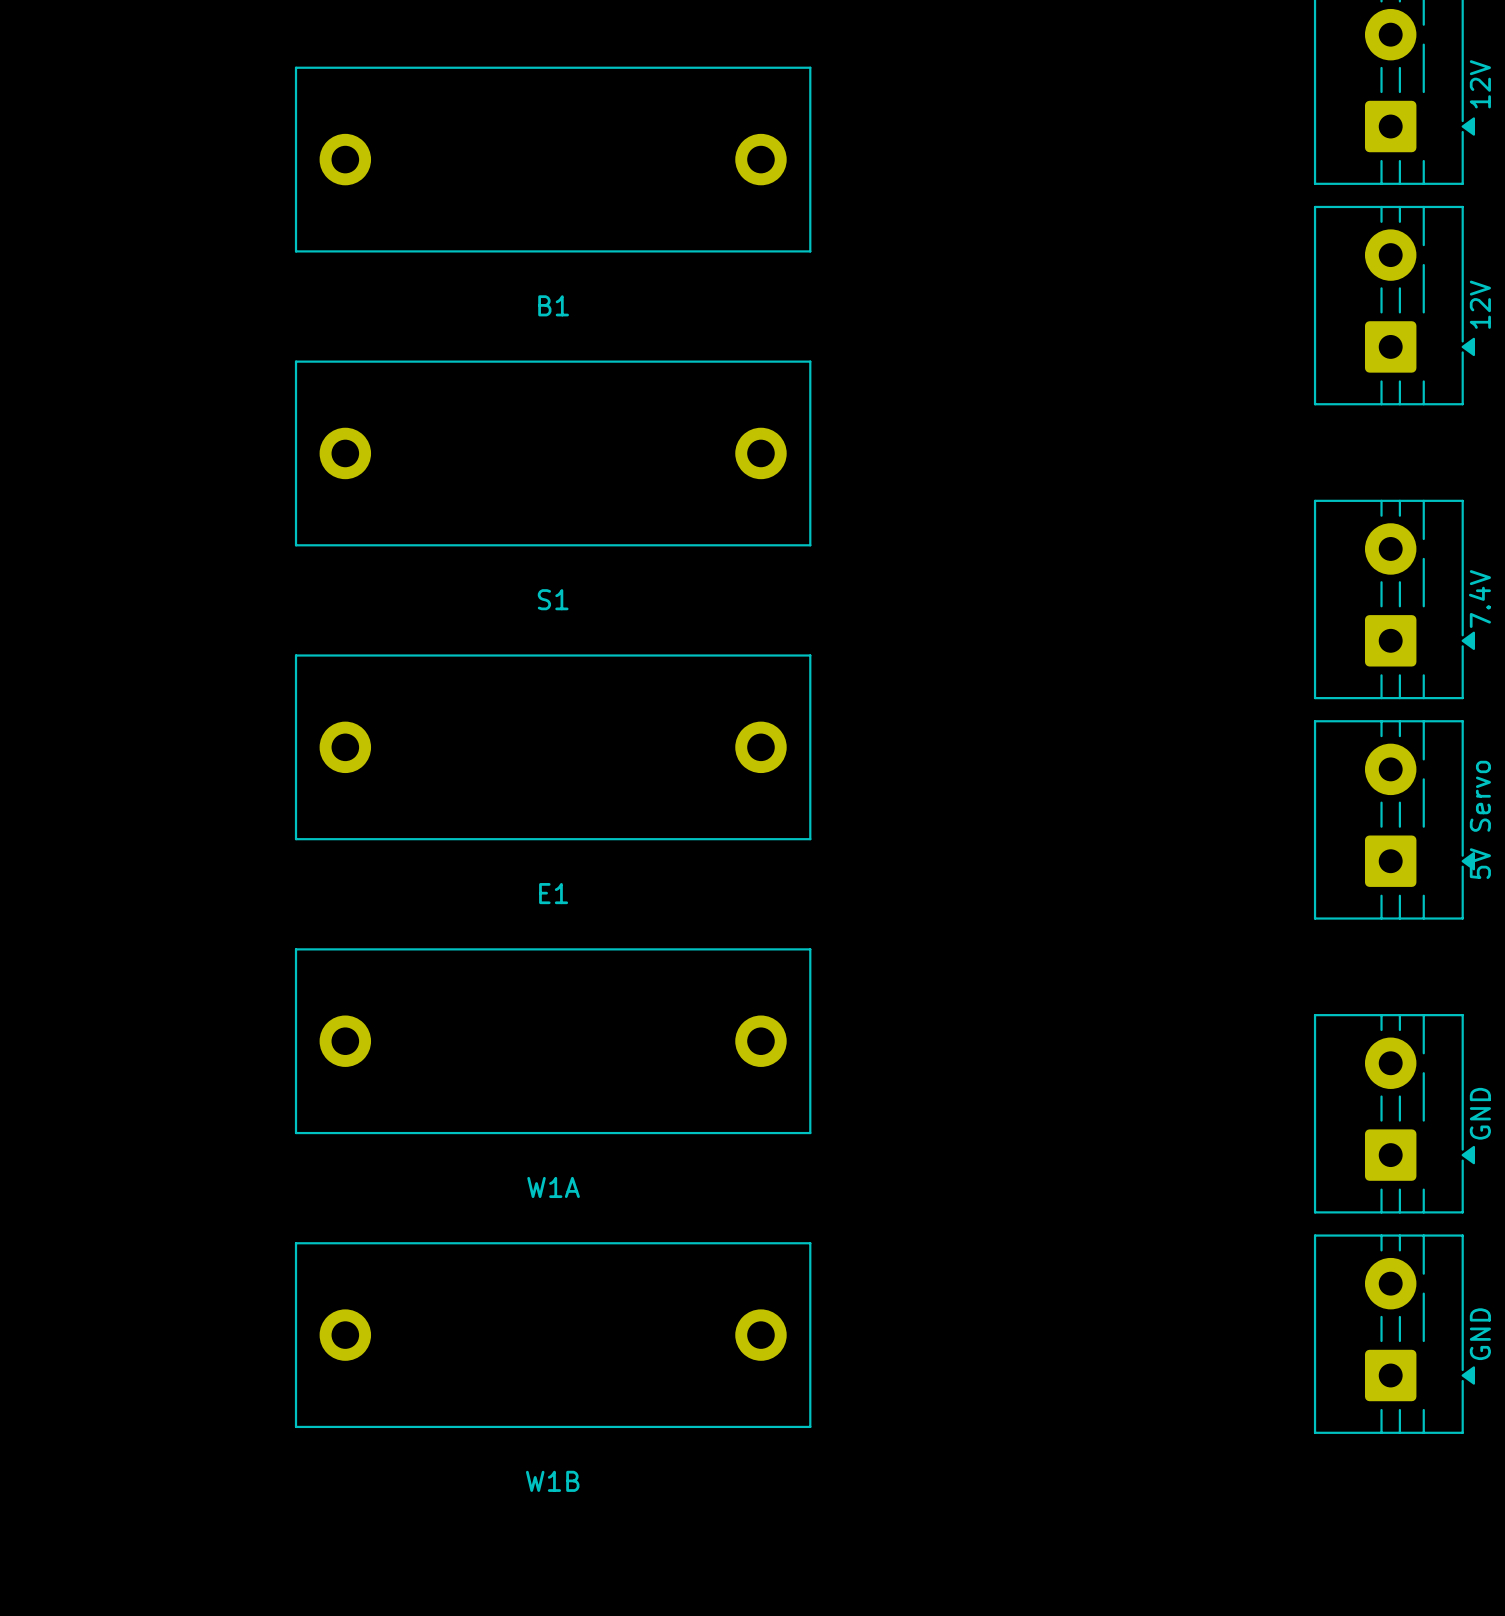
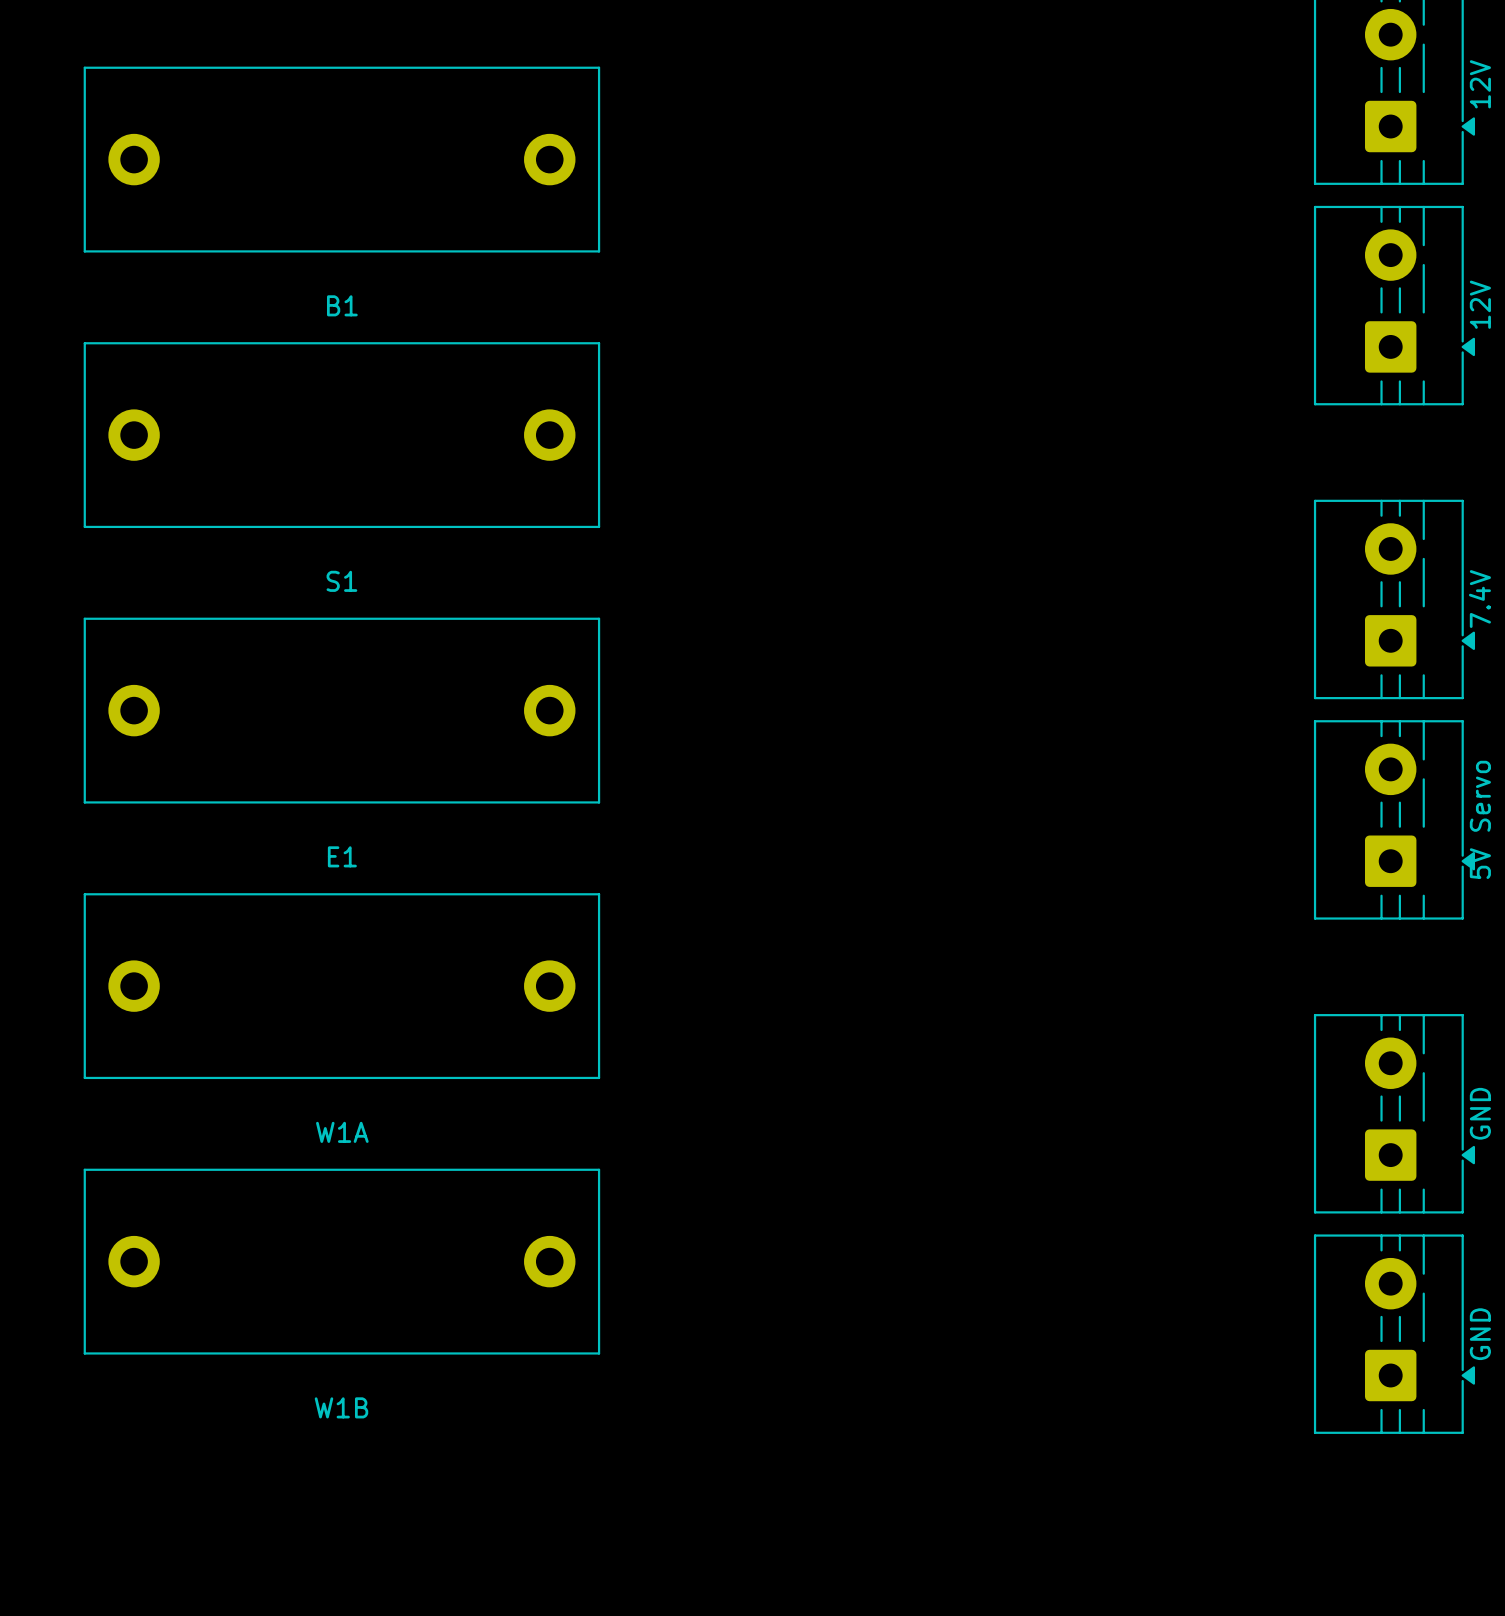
part position: (553, 159) -> (341, 159)
part position: (553, 453) -> (341, 435)
part position: (553, 747) -> (341, 710)
part position: (553, 1041) -> (341, 986)
part position: (553, 1335) -> (341, 1261)

